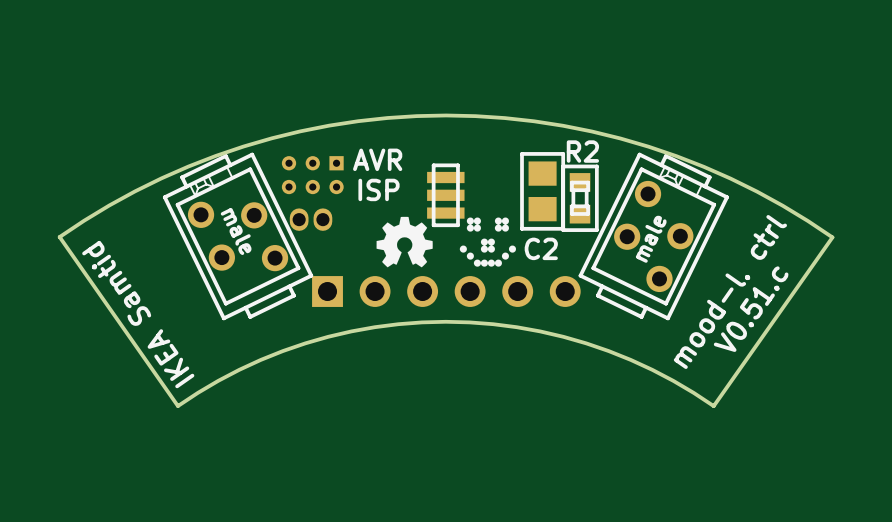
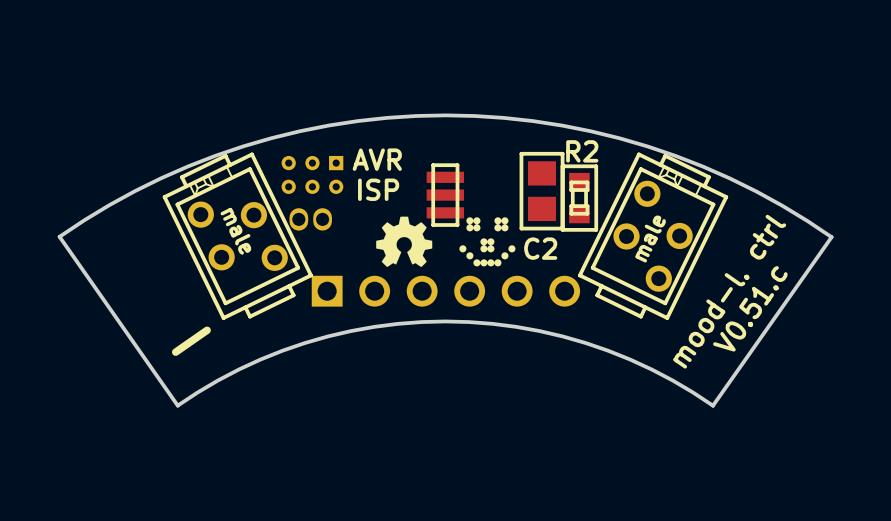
text: IKEA Samtid (138, 314) -> none
line: none -> (207, 330) (175, 352)

